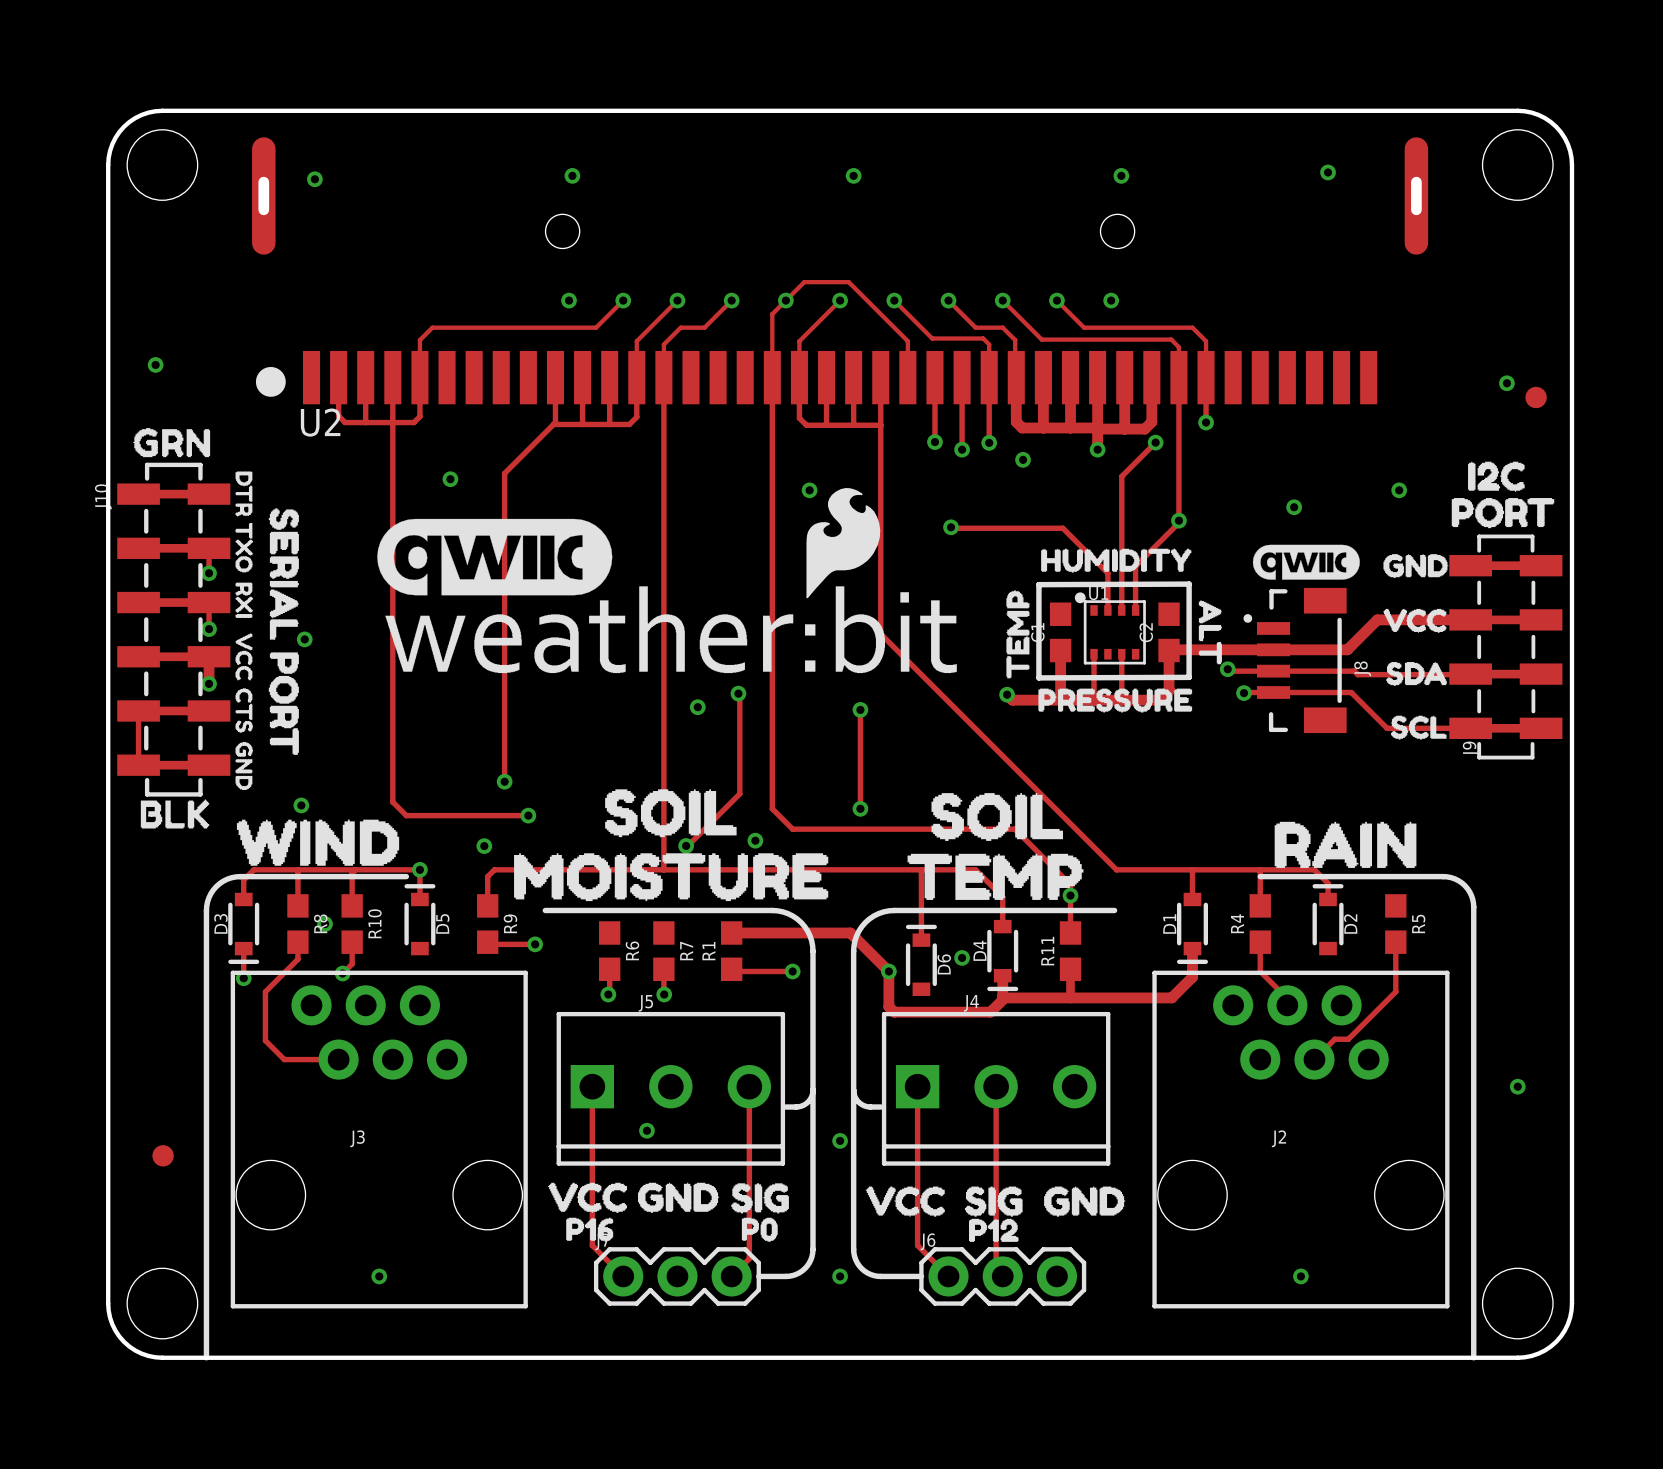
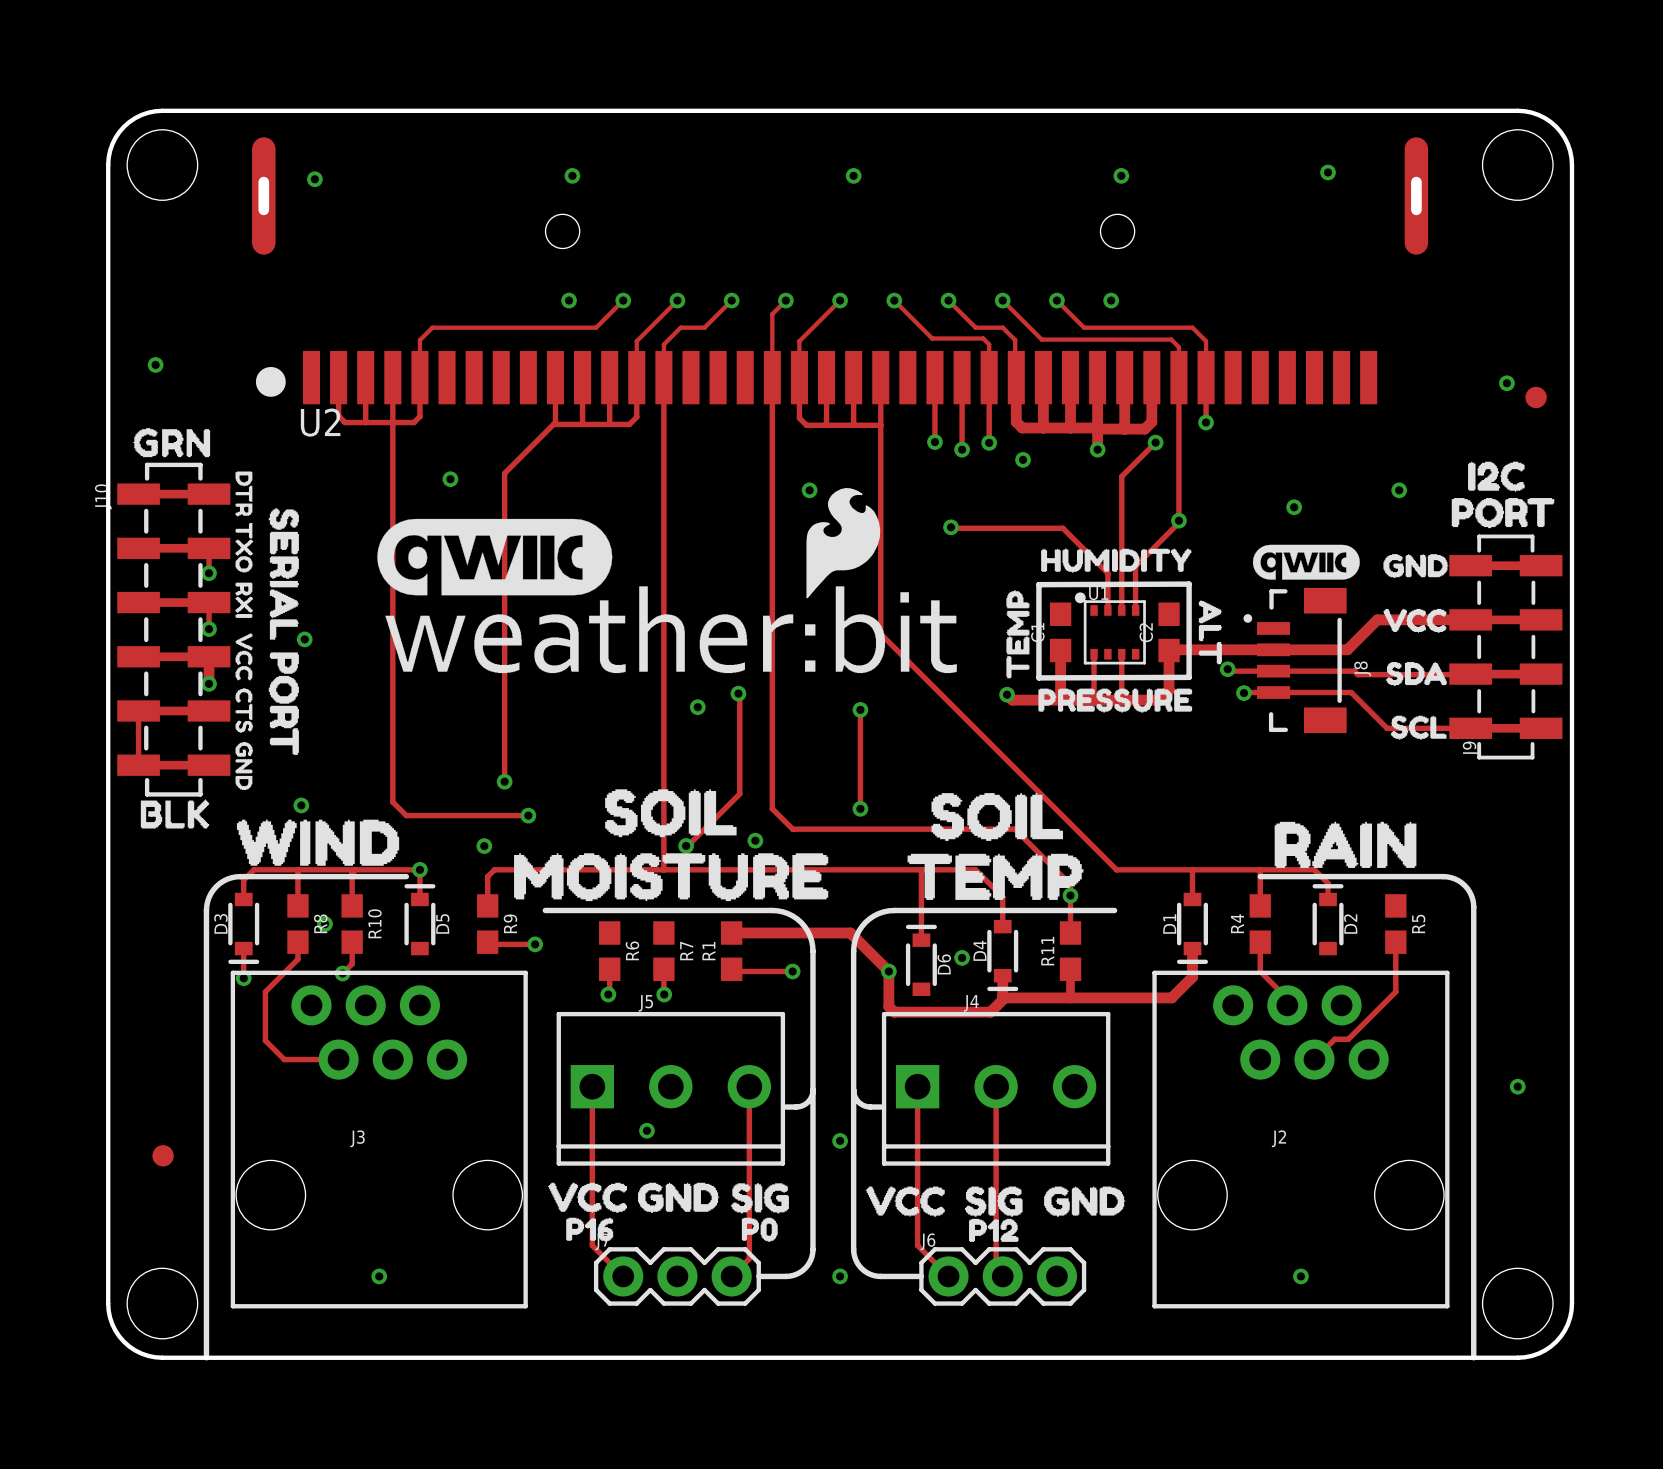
track: (785, 300) (804, 282) (848, 282) (907, 341) (907, 377) -> none

